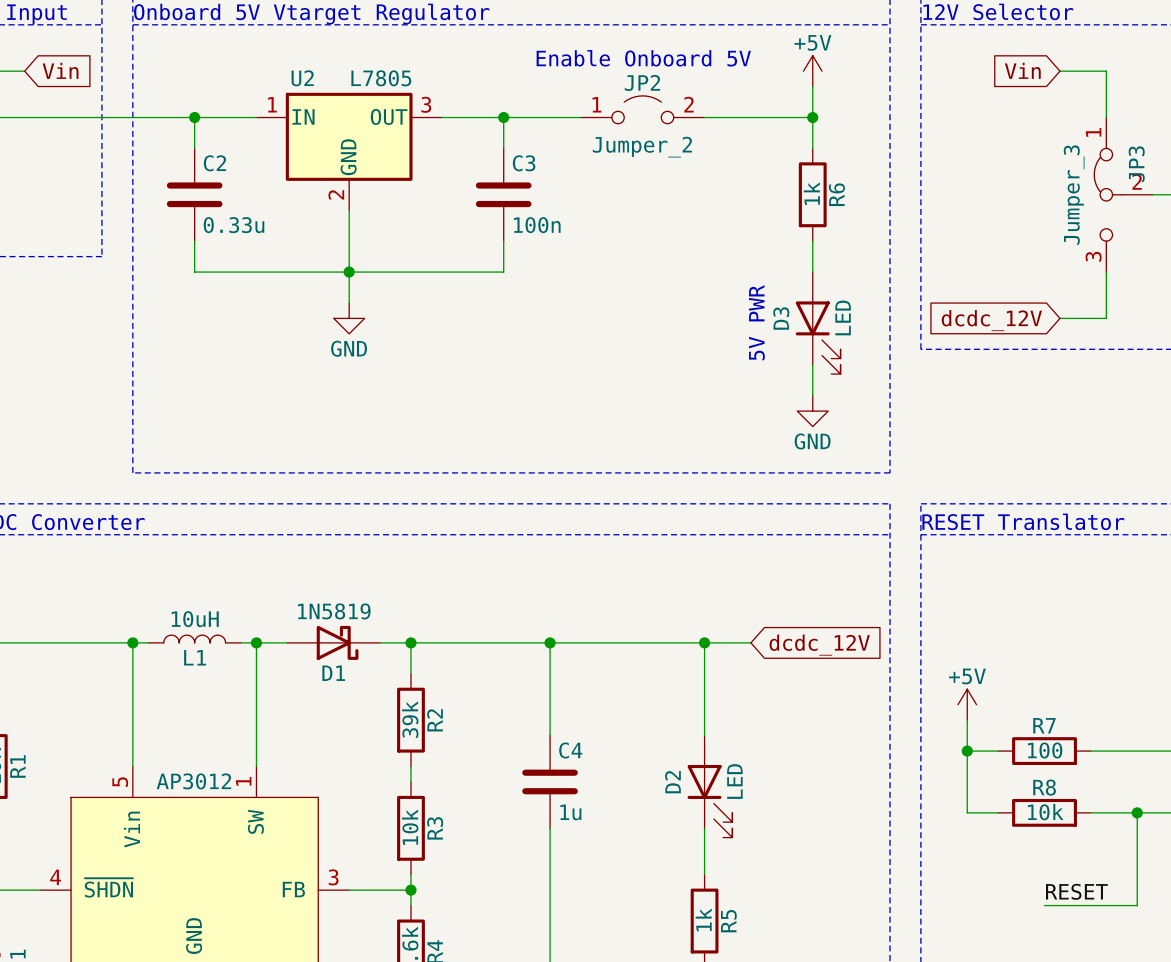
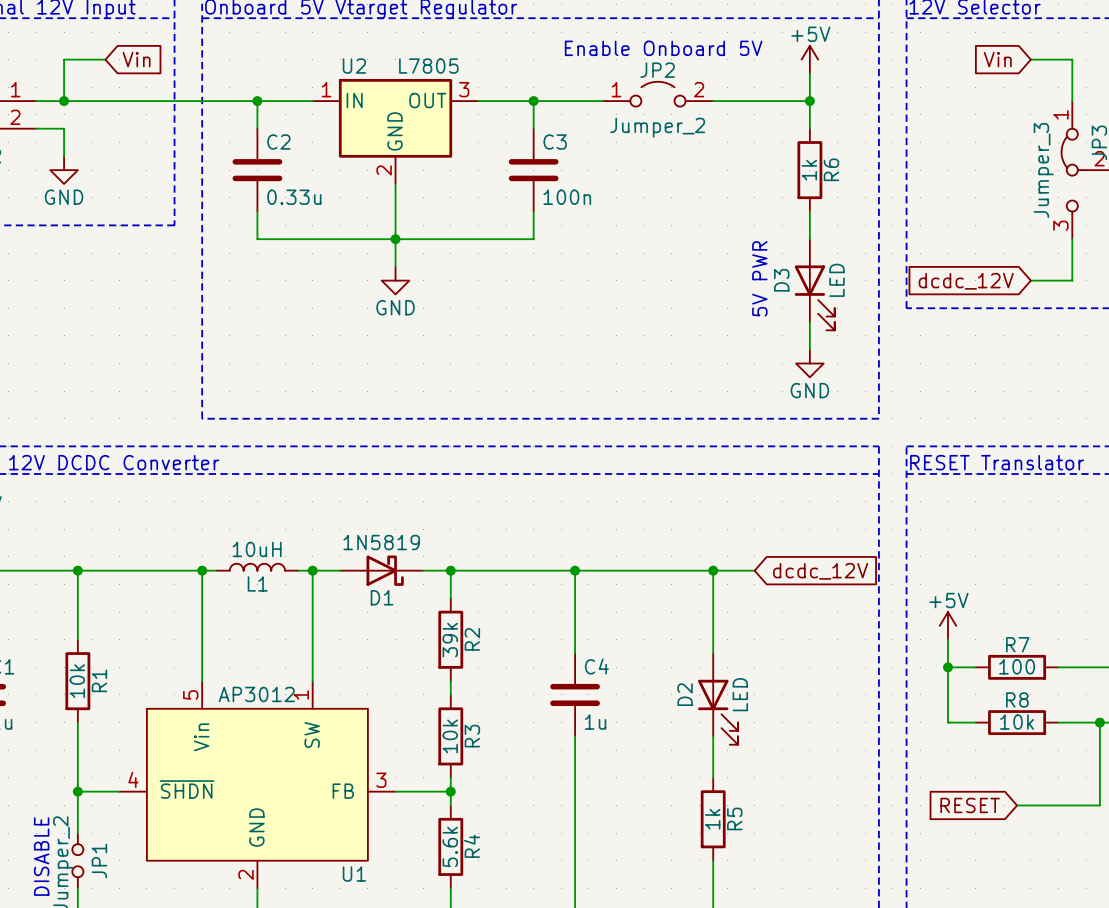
label: RESET (1076, 891) -> none
global label: none -> RESET (970, 805)

